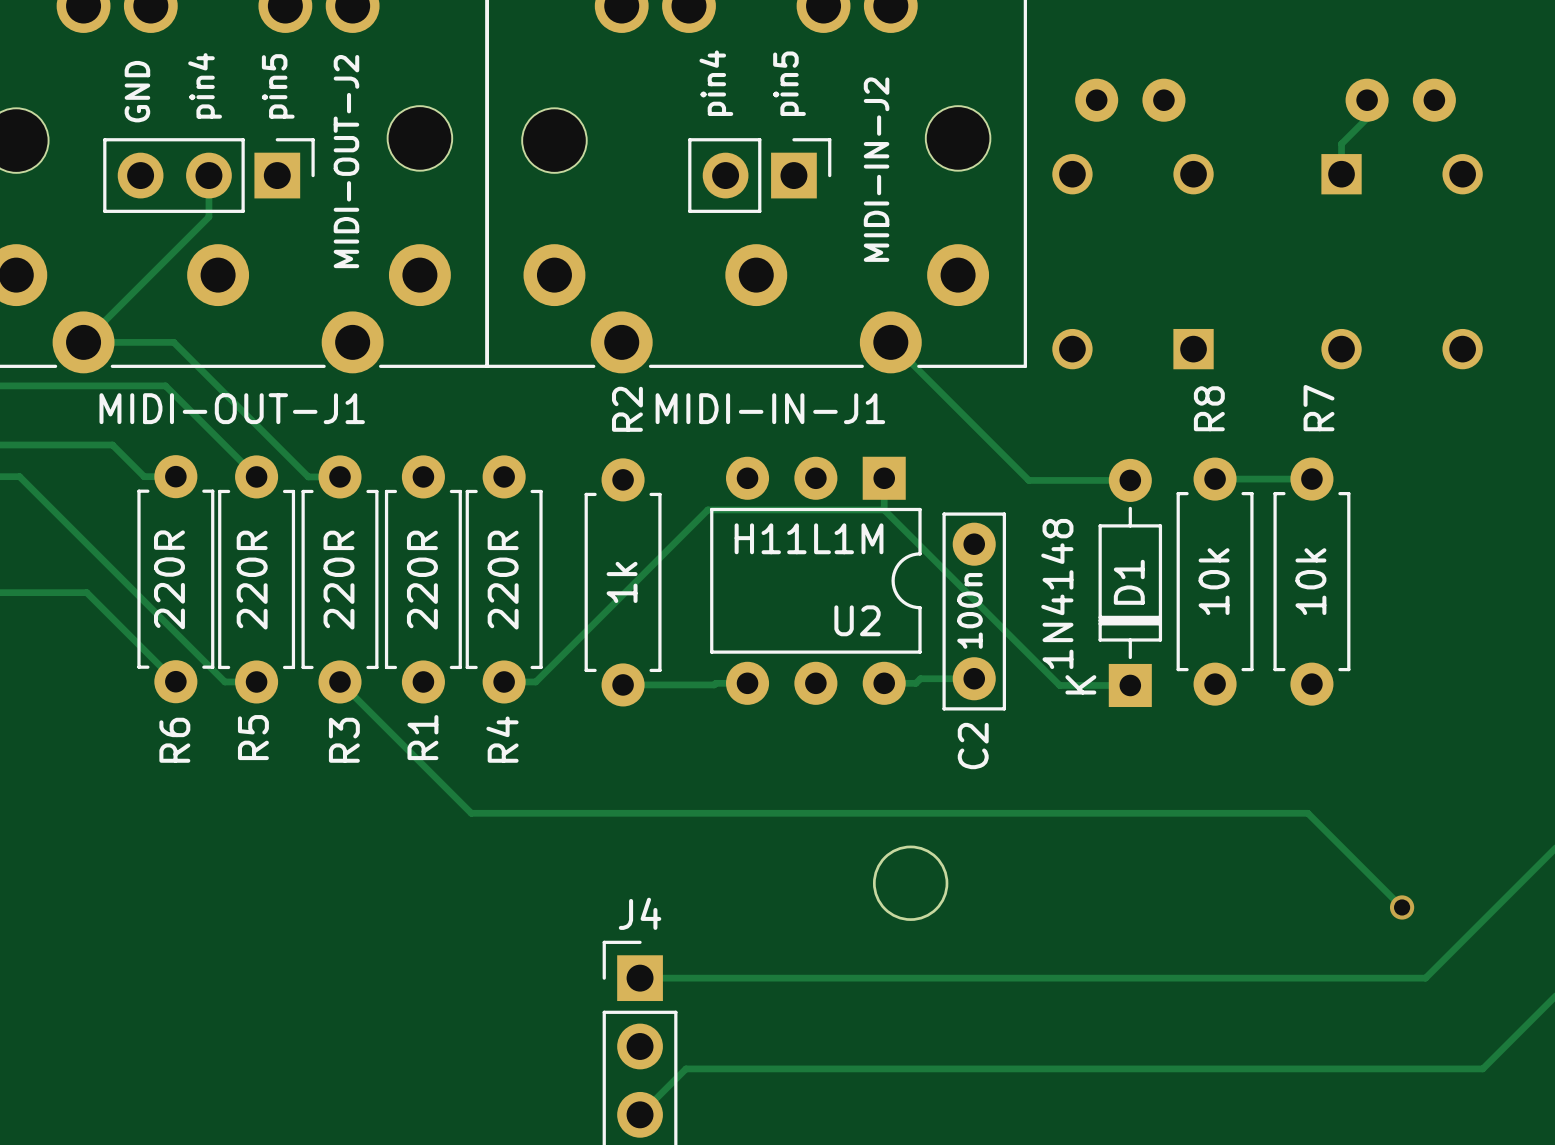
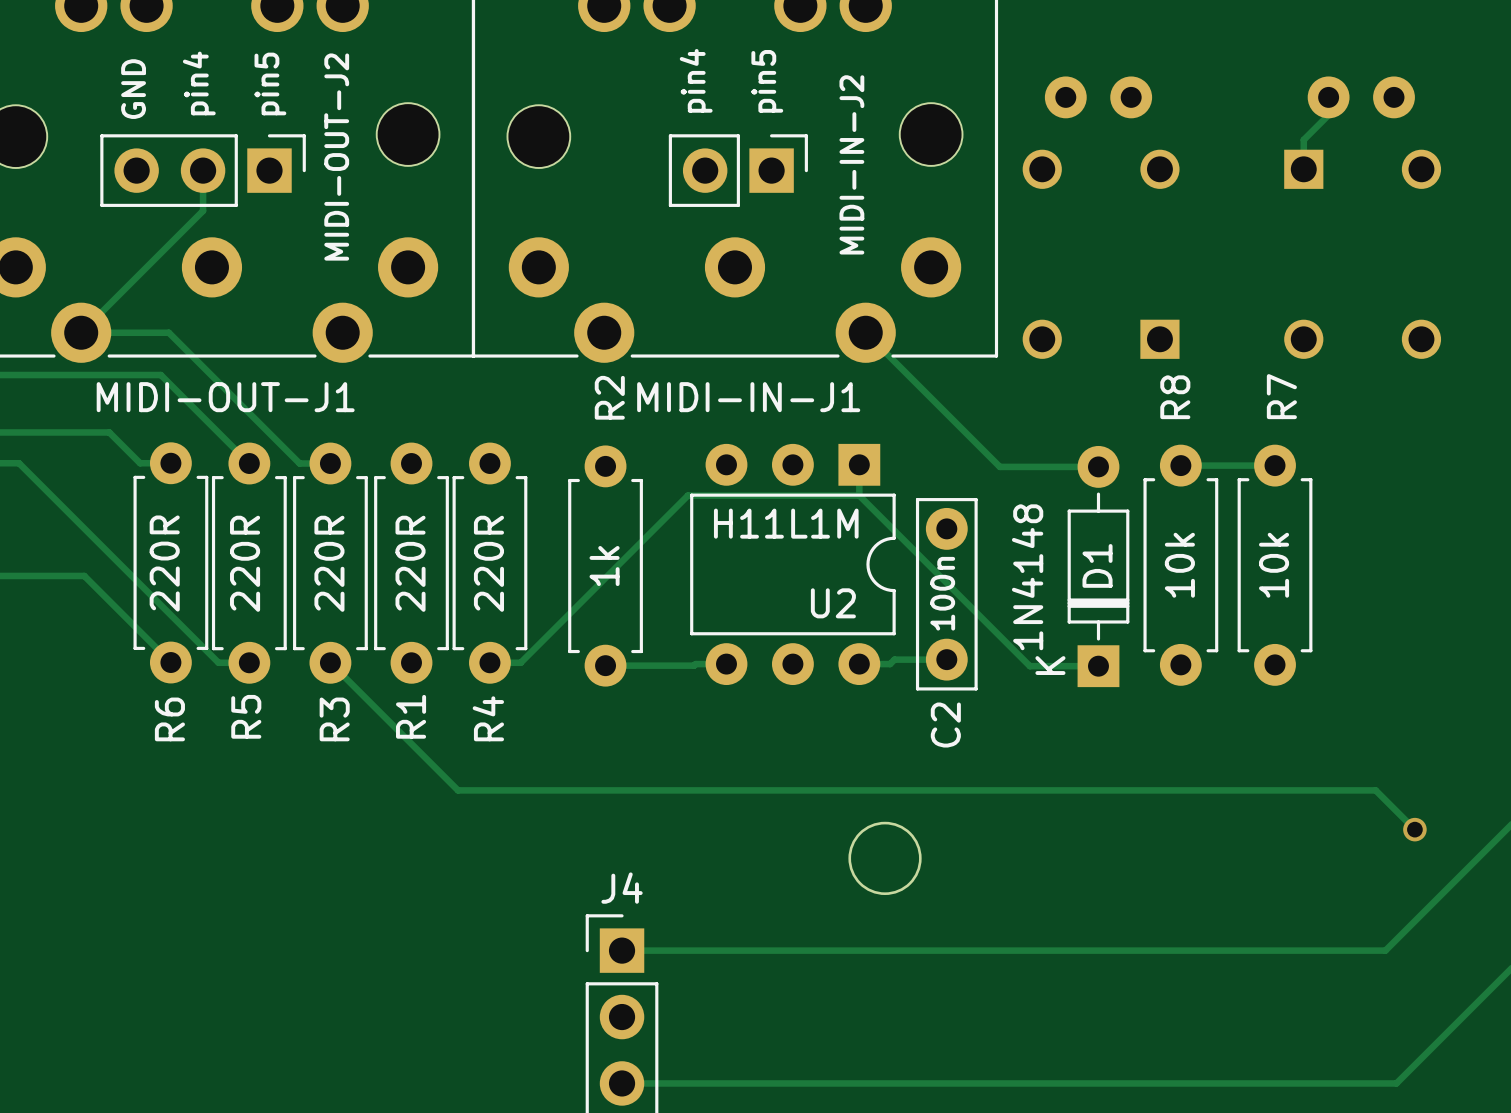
track: (1307, 813) (1402, 907) -> (1271, 790) (1375, 790) (1414, 829)
via position: (1402, 907) -> (1414, 829)
track: (1482, 1068) (685, 1068) (640, 1114) -> (1441, 1038) (1396, 1083) (622, 1083)

